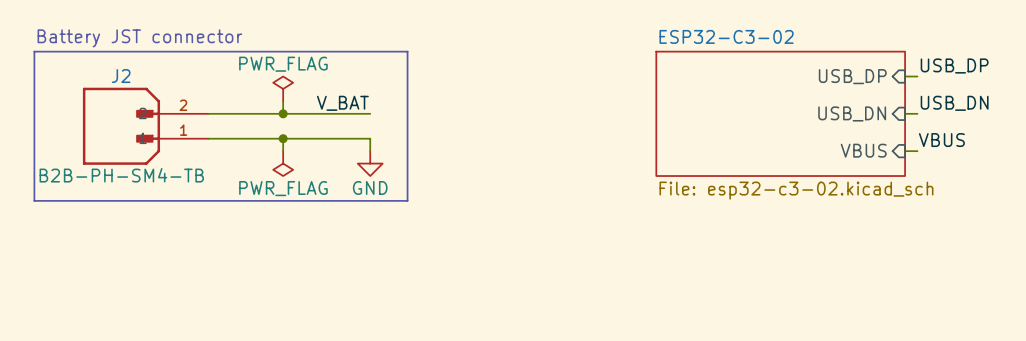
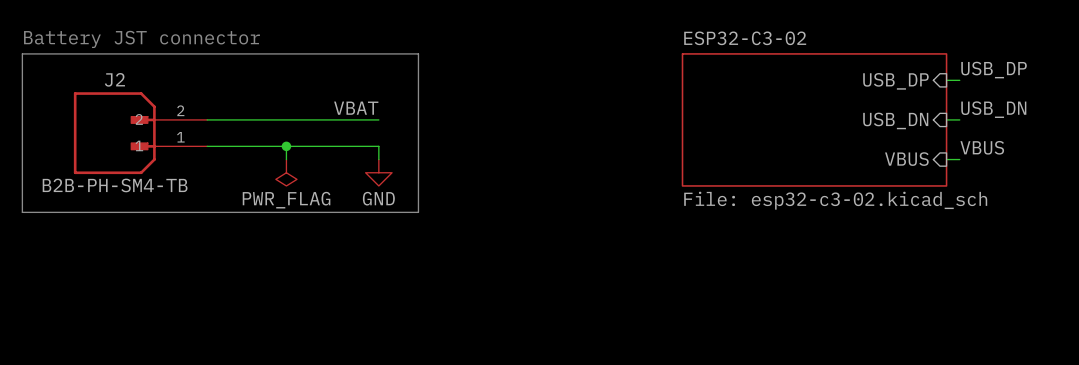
power symbol: PWR_FLAG (283, 88) -> none
wire: (283, 101) (283, 113) -> none
label: V_BAT (342, 103) -> VBAT (356, 108)
junction: (283, 113) -> none

